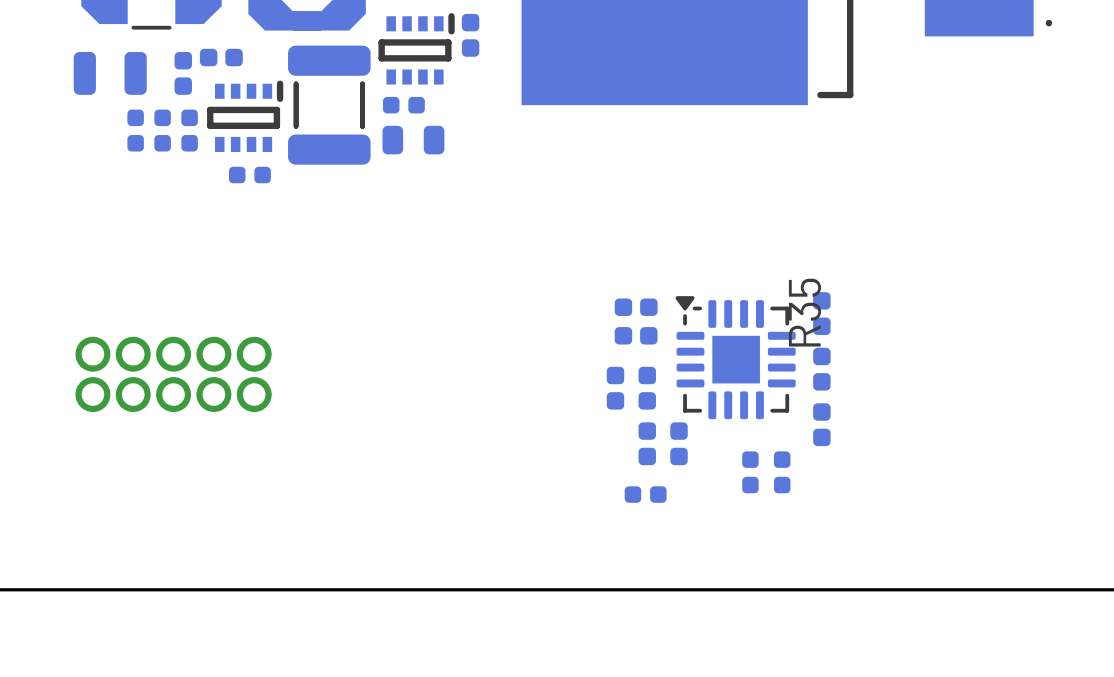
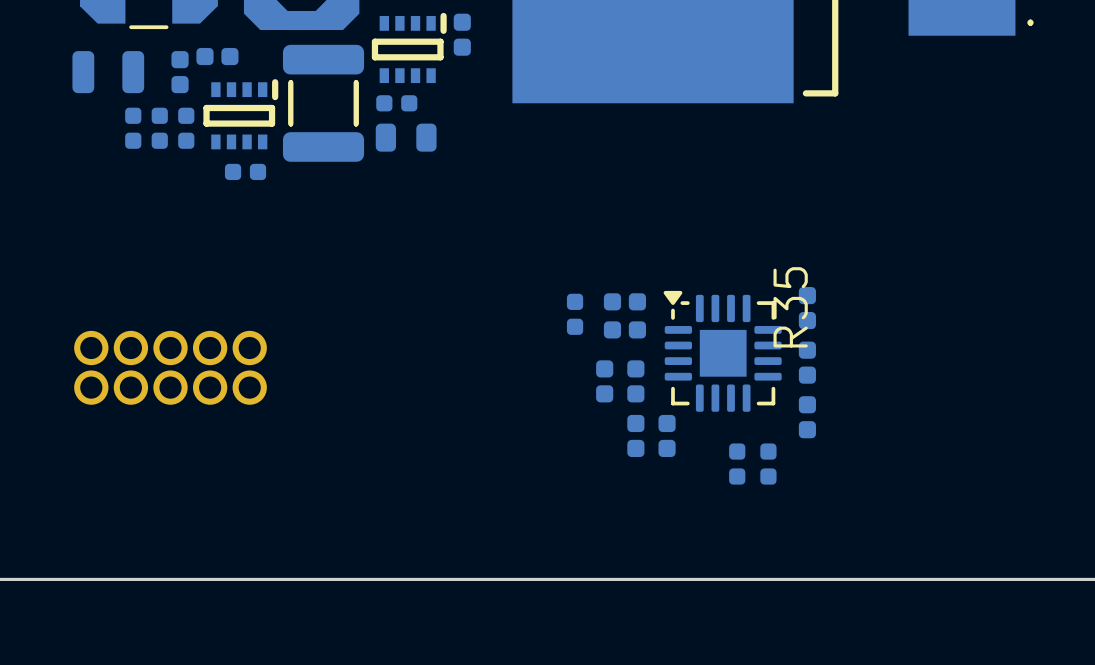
part rotation: 0° (645, 494) -> 90° clockwise (575, 314)
part position: (645, 494) -> (575, 314)

